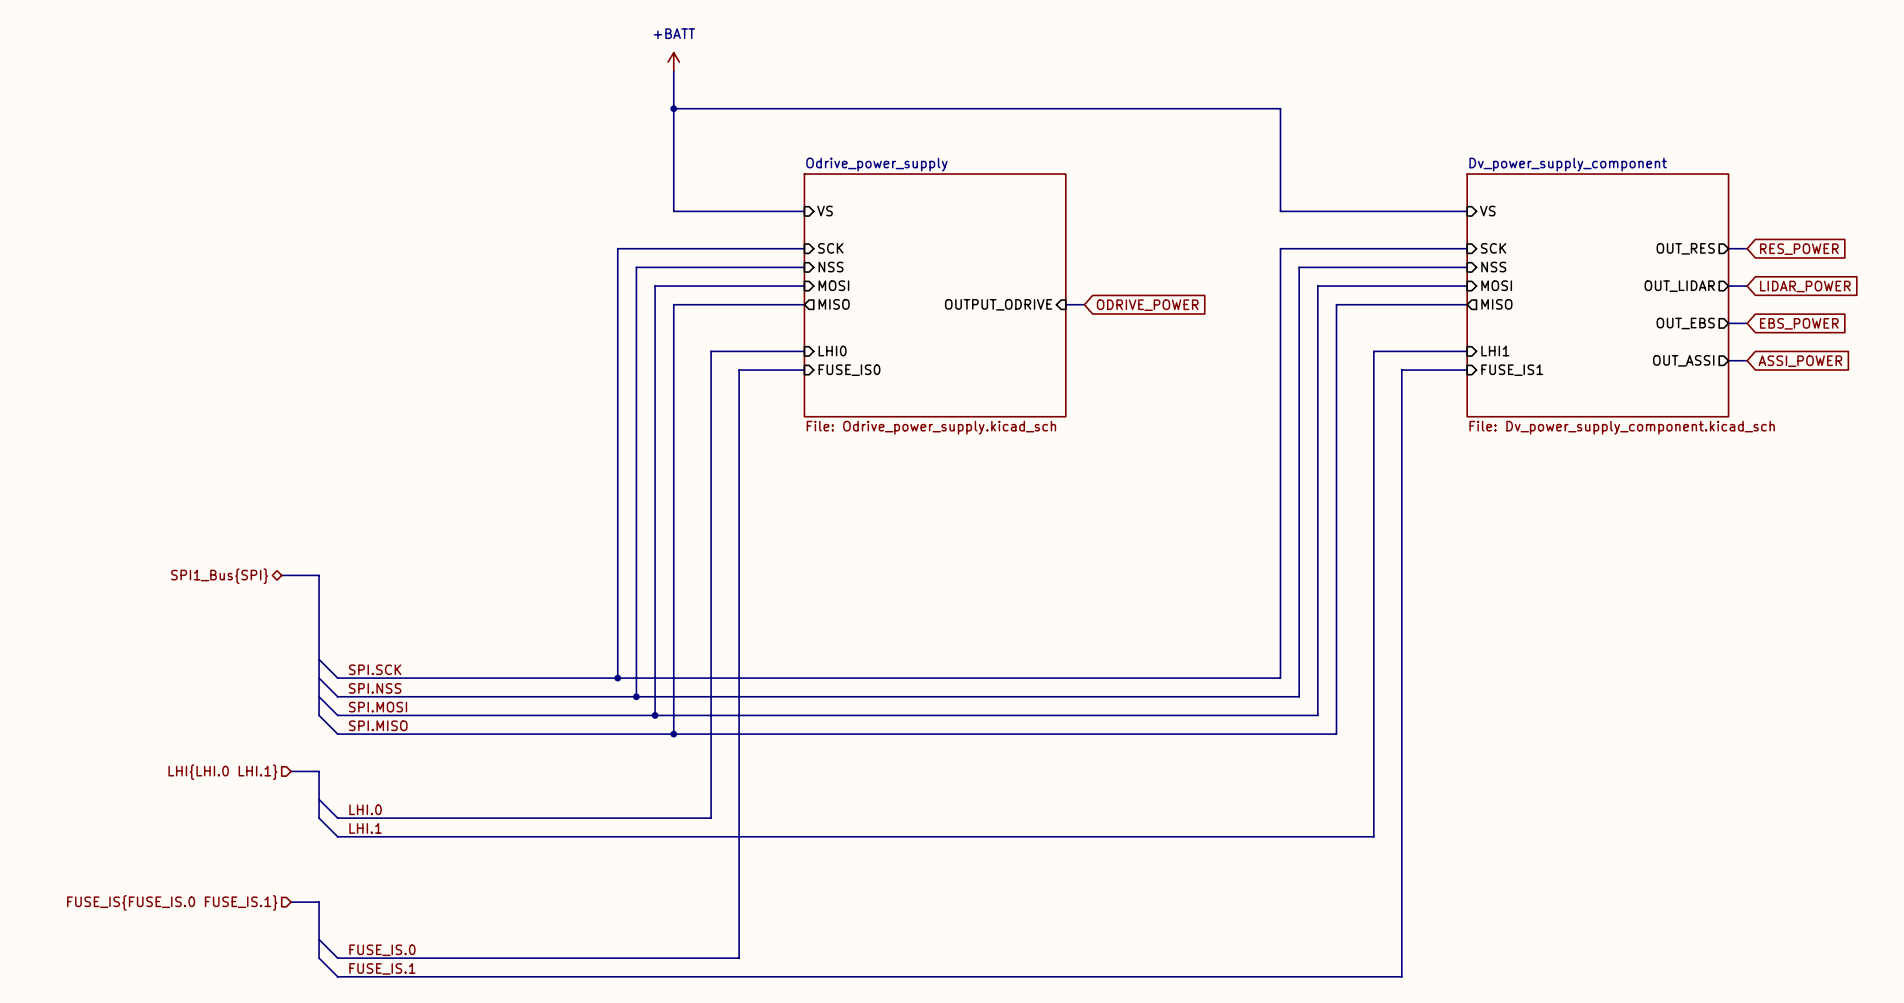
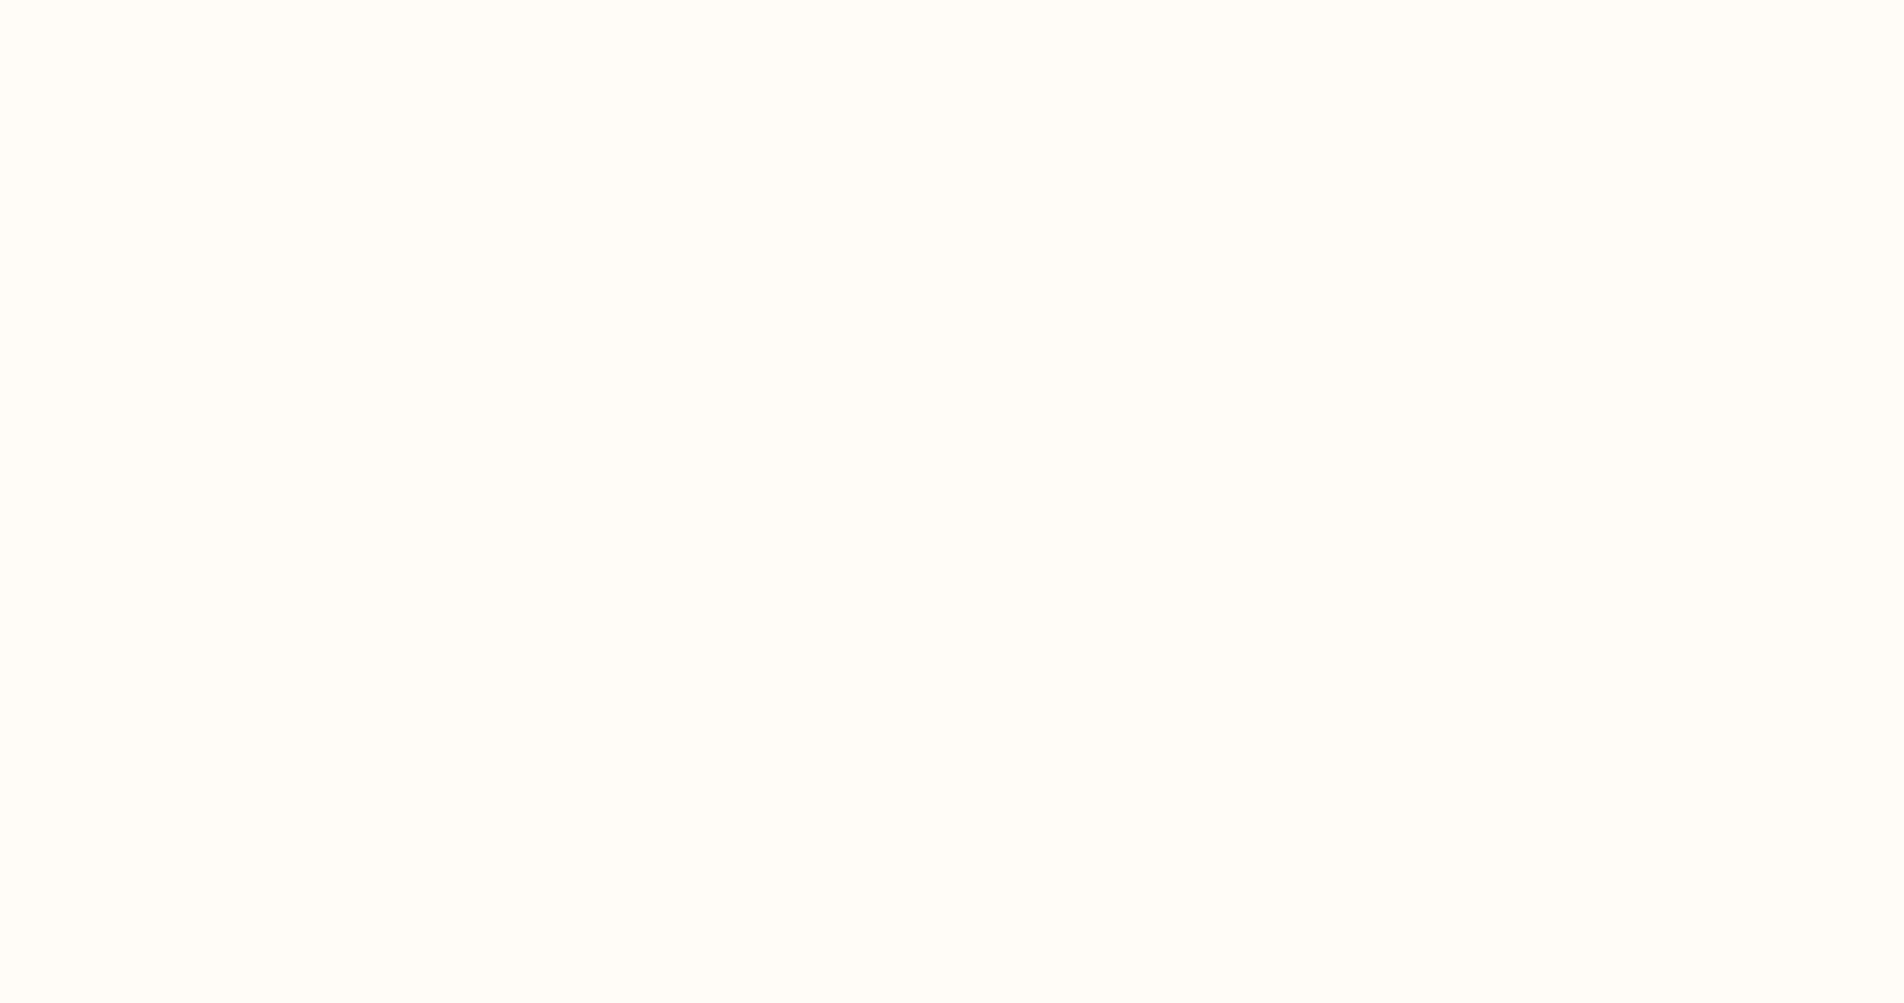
power symbol: +BATT (673, 62) -> none
wire: (673, 71) (673, 211) (804, 211) -> none
wire: (673, 108) (1280, 108) (1280, 211) (1467, 211) -> none
junction: (673, 108) -> none
sheet pin: VS (825, 211) -> none
sheet pin: VS (1487, 211) -> none
wire: (804, 248) (617, 248) (617, 678) -> none
sheet pin: SCK (830, 248) -> none
wire: (1467, 248) (1280, 248) (1280, 678) (337, 678) (319, 659) -> none
sheet pin: SCK (1493, 248) -> none
sheet pin: OUT_RES (1685, 248) -> none
wire: (1728, 248) (1747, 248) -> none
global label: RES_POWER (1799, 249) -> none
wire: (804, 267) (636, 267) (636, 696) -> none
sheet pin: NSS (831, 267) -> none
wire: (1467, 267) (1299, 267) (1299, 696) (337, 696) (319, 678) -> none
sheet pin: NSS (1493, 267) -> none
sheet pin: MOSI (833, 285) -> none
sheet pin: MOSI (1496, 285) -> none
wire: (804, 286) (655, 286) (655, 715) -> none
wire: (1467, 286) (1317, 286) (1317, 715) (337, 715) (319, 696) -> none
sheet pin: OUT_LIDAR (1679, 286) -> none
wire: (1728, 286) (1747, 286) -> none
global label: LIDAR_POWER (1805, 286) -> none
sheet Odrive_power_supply: File: Odrive_power_supply.kicad_sch (935, 295) -> none
sheet Dv_power_supply_component: File: Dv_power_supply_component.kicad_sch (1597, 295) -> none
wire: (804, 304) (673, 304) (673, 734) -> none
sheet pin: MISO (834, 304) -> none
sheet pin: OUTPUT_ODRIVE (998, 304) -> none
wire: (1065, 304) (1084, 304) -> none
wire: (1467, 304) (1336, 304) (1336, 734) (337, 734) (319, 715) -> none
sheet pin: MISO (1496, 304) -> none
global label: ODRIVE_POWER (1147, 305) -> none
sheet pin: OUT_EBS (1685, 323) -> none
wire: (1728, 323) (1747, 323) -> none
global label: EBS_POWER (1799, 323) -> none
wire: (804, 351) (711, 351) (711, 818) (337, 818) (319, 799) -> none
sheet pin: LHI0 (832, 351) -> none
wire: (1467, 351) (1373, 351) (1373, 836) (337, 836) (319, 818) -> none
sheet pin: LHI1 (1495, 351) -> none
sheet pin: OUT_ASSI (1683, 360) -> none
wire: (1728, 360) (1747, 360) -> none
global label: ASSI_POWER (1800, 361) -> none
wire: (804, 370) (739, 370) (739, 958) (337, 958) (319, 939) -> none
sheet pin: FUSE_IS0 (849, 370) -> none
wire: (1467, 370) (1401, 370) (1401, 976) (337, 976) (319, 958) -> none
sheet pin: FUSE_IS1 (1512, 370) -> none
bus: (281, 575) (319, 575) (319, 715) -> none
hierarchical label: SPI1_Bus{SPI} (219, 576) -> none
label: SPI.SCK (375, 669) -> none
junction: (617, 678) -> none
label: SPI.NSS (375, 688) -> none
junction: (636, 696) -> none
label: SPI.MOSI (378, 707) -> none
junction: (655, 715) -> none
label: SPI.MISO (378, 725) -> none
junction: (673, 734) -> none
bus: (291, 771) (319, 771) (319, 818) -> none
hierarchical label: LHI{LHI.0 LHI.1} (222, 772) -> none
label: LHI.0 (365, 809) -> none
label: LHI.1 (365, 828) -> none
hierarchical label: FUSE_IS{FUSE_IS.0 FUSE_IS.1} (172, 902) -> none
bus: (291, 902) (319, 902) (319, 958) -> none
label: FUSE_IS.0 (382, 950) -> none
label: FUSE_IS.1 (382, 968) -> none

